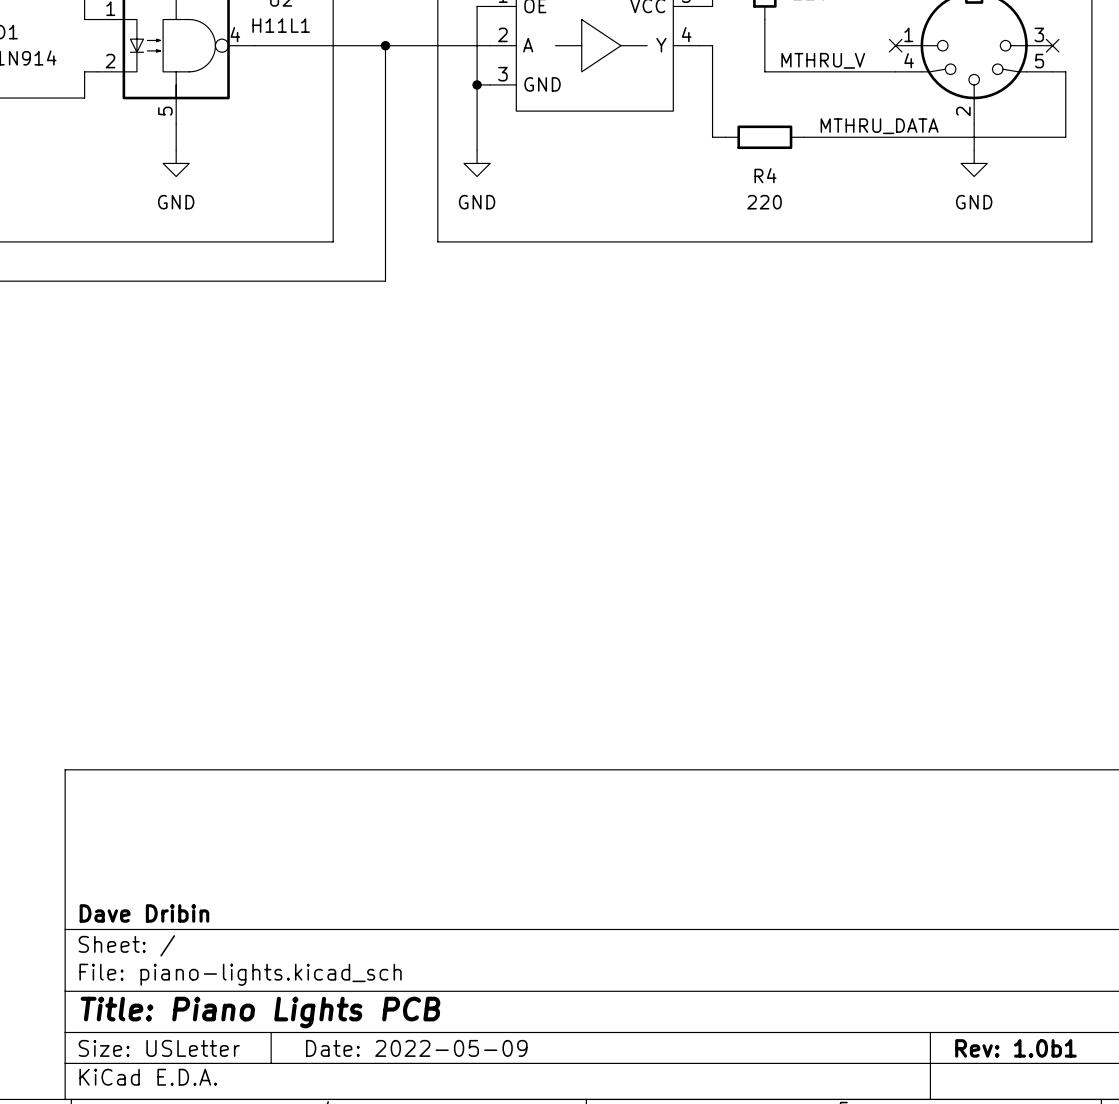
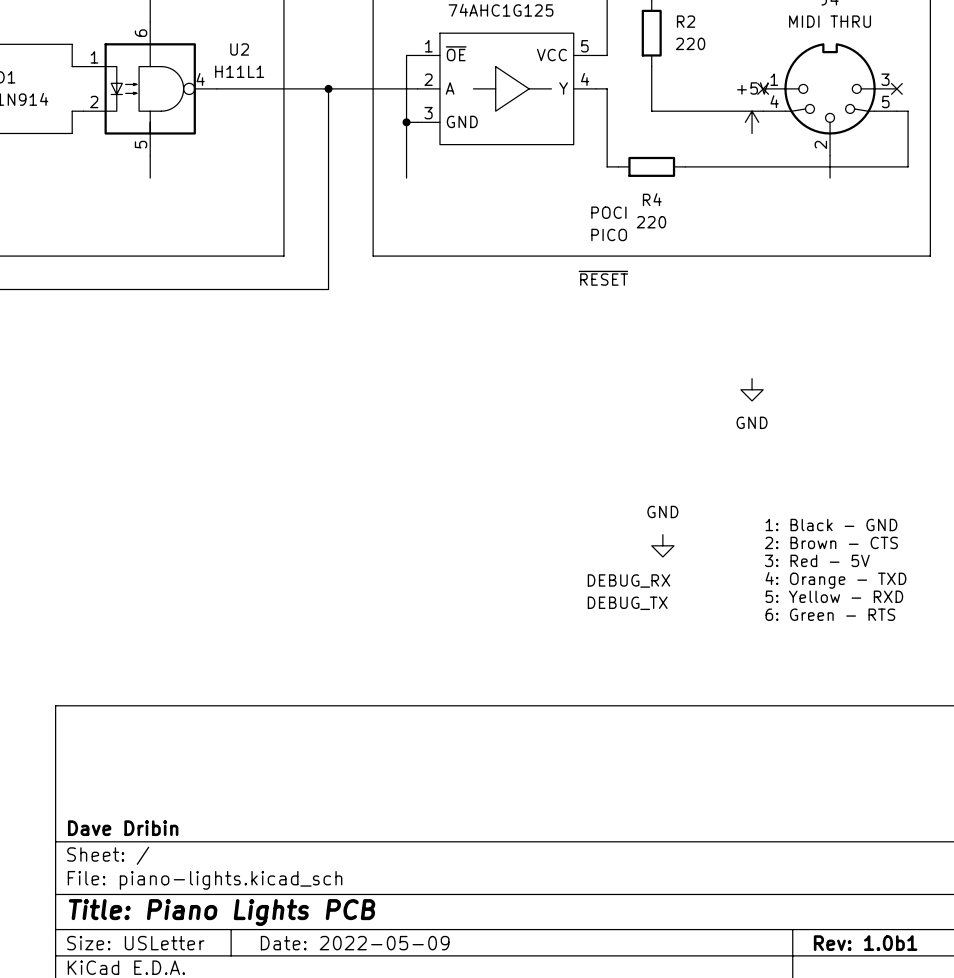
label: MTHRU_V (823, 60) -> none
power symbol: none -> +5V (752, 122)
label: MTHRU_DATA (879, 126) -> none
power symbol: GND (176, 163) -> none
power symbol: GND (477, 163) -> none
power symbol: GND (974, 163) -> none
label: none -> POCI (608, 212)
label: none -> PICO (609, 234)
label: none -> ~{RESET} (603, 278)
power symbol: none -> GND (752, 389)
text: none -> 1: Black - GND (831, 524)
text: none -> 2: Brown - CTS (831, 542)
power symbol: none -> GND (662, 545)
text: none -> 3: Red - 5V (817, 560)
text: none -> 4: Orange - TXD (835, 580)
label: none -> DEBUG_RX (628, 580)
text: none -> 5: Yellow - RXD (834, 596)
label: none -> DEBUG_TX (627, 603)
text: none -> 6: Green - RTS (830, 614)

